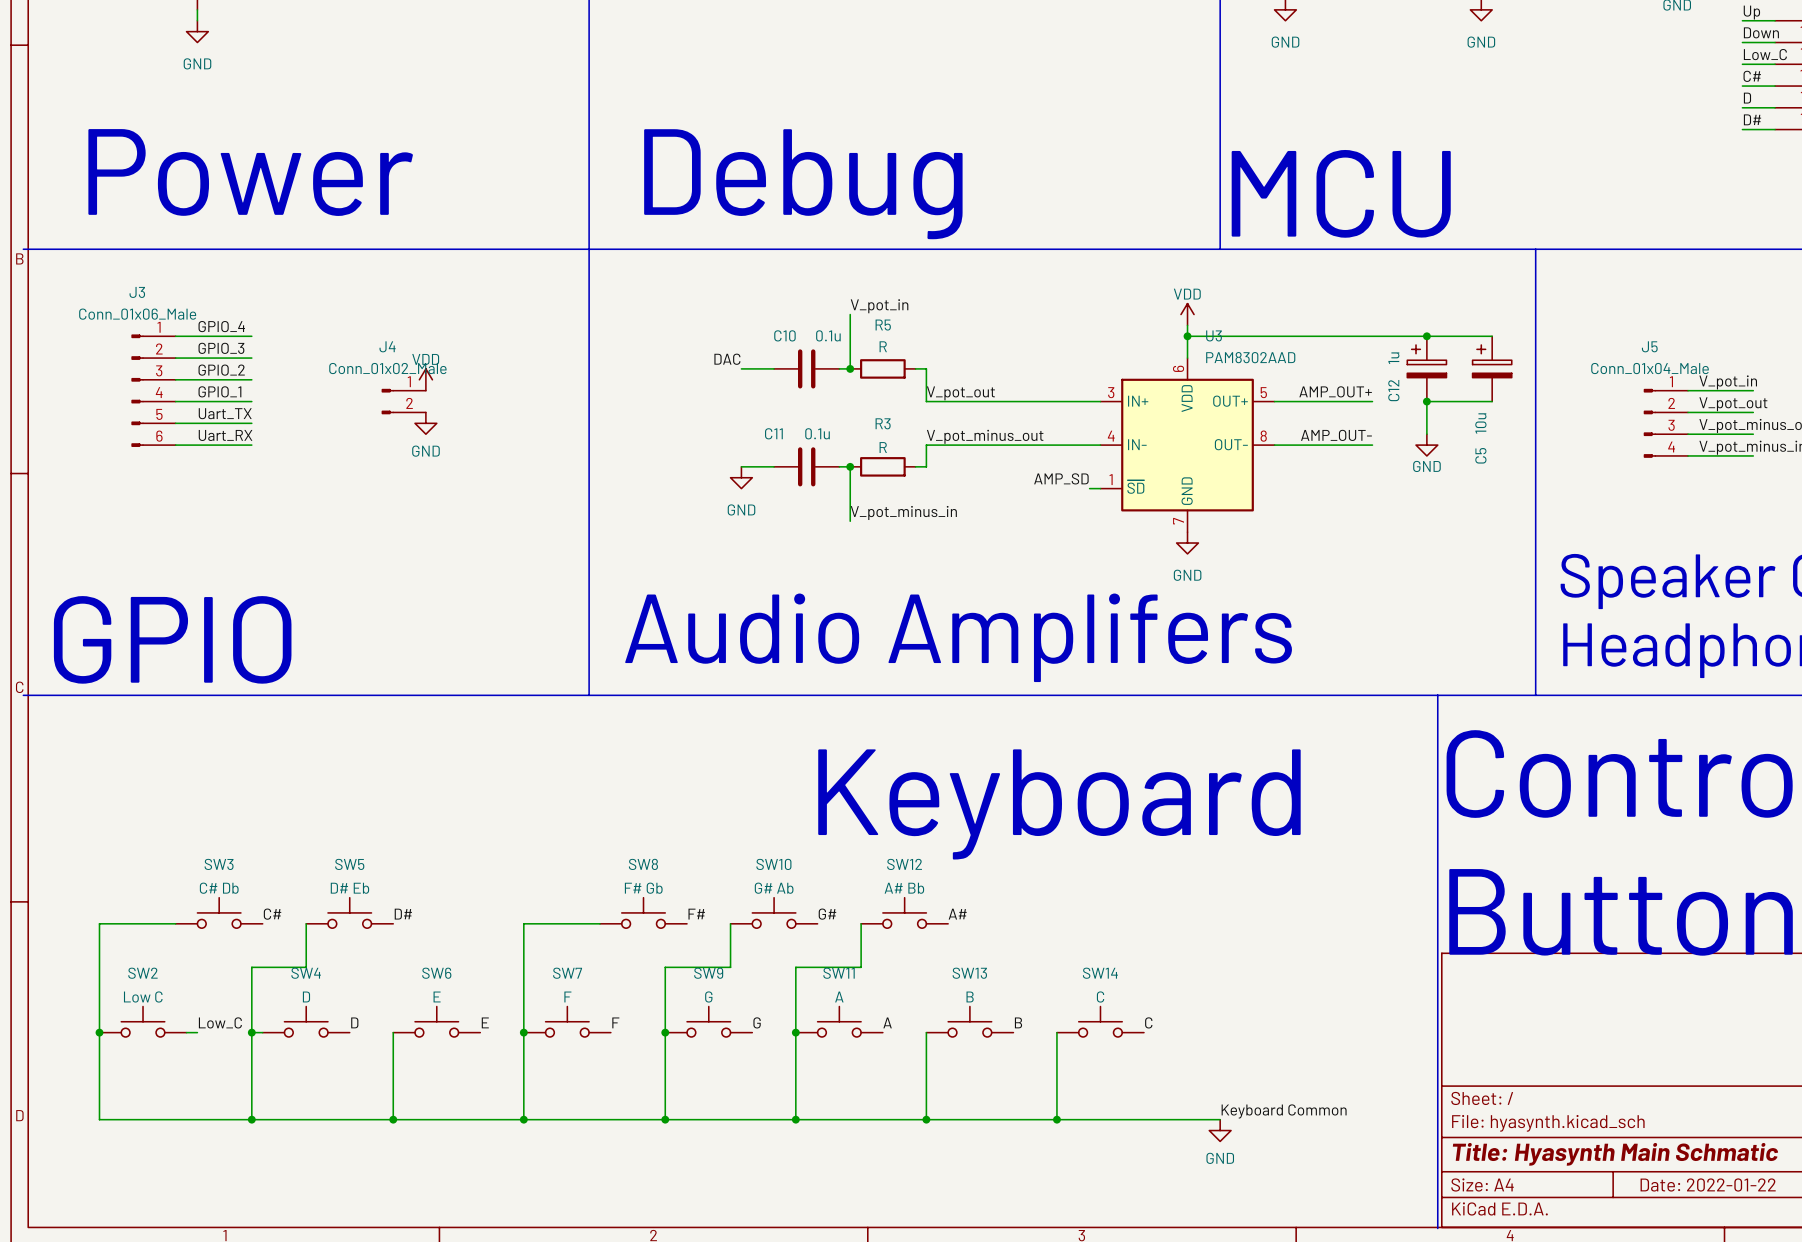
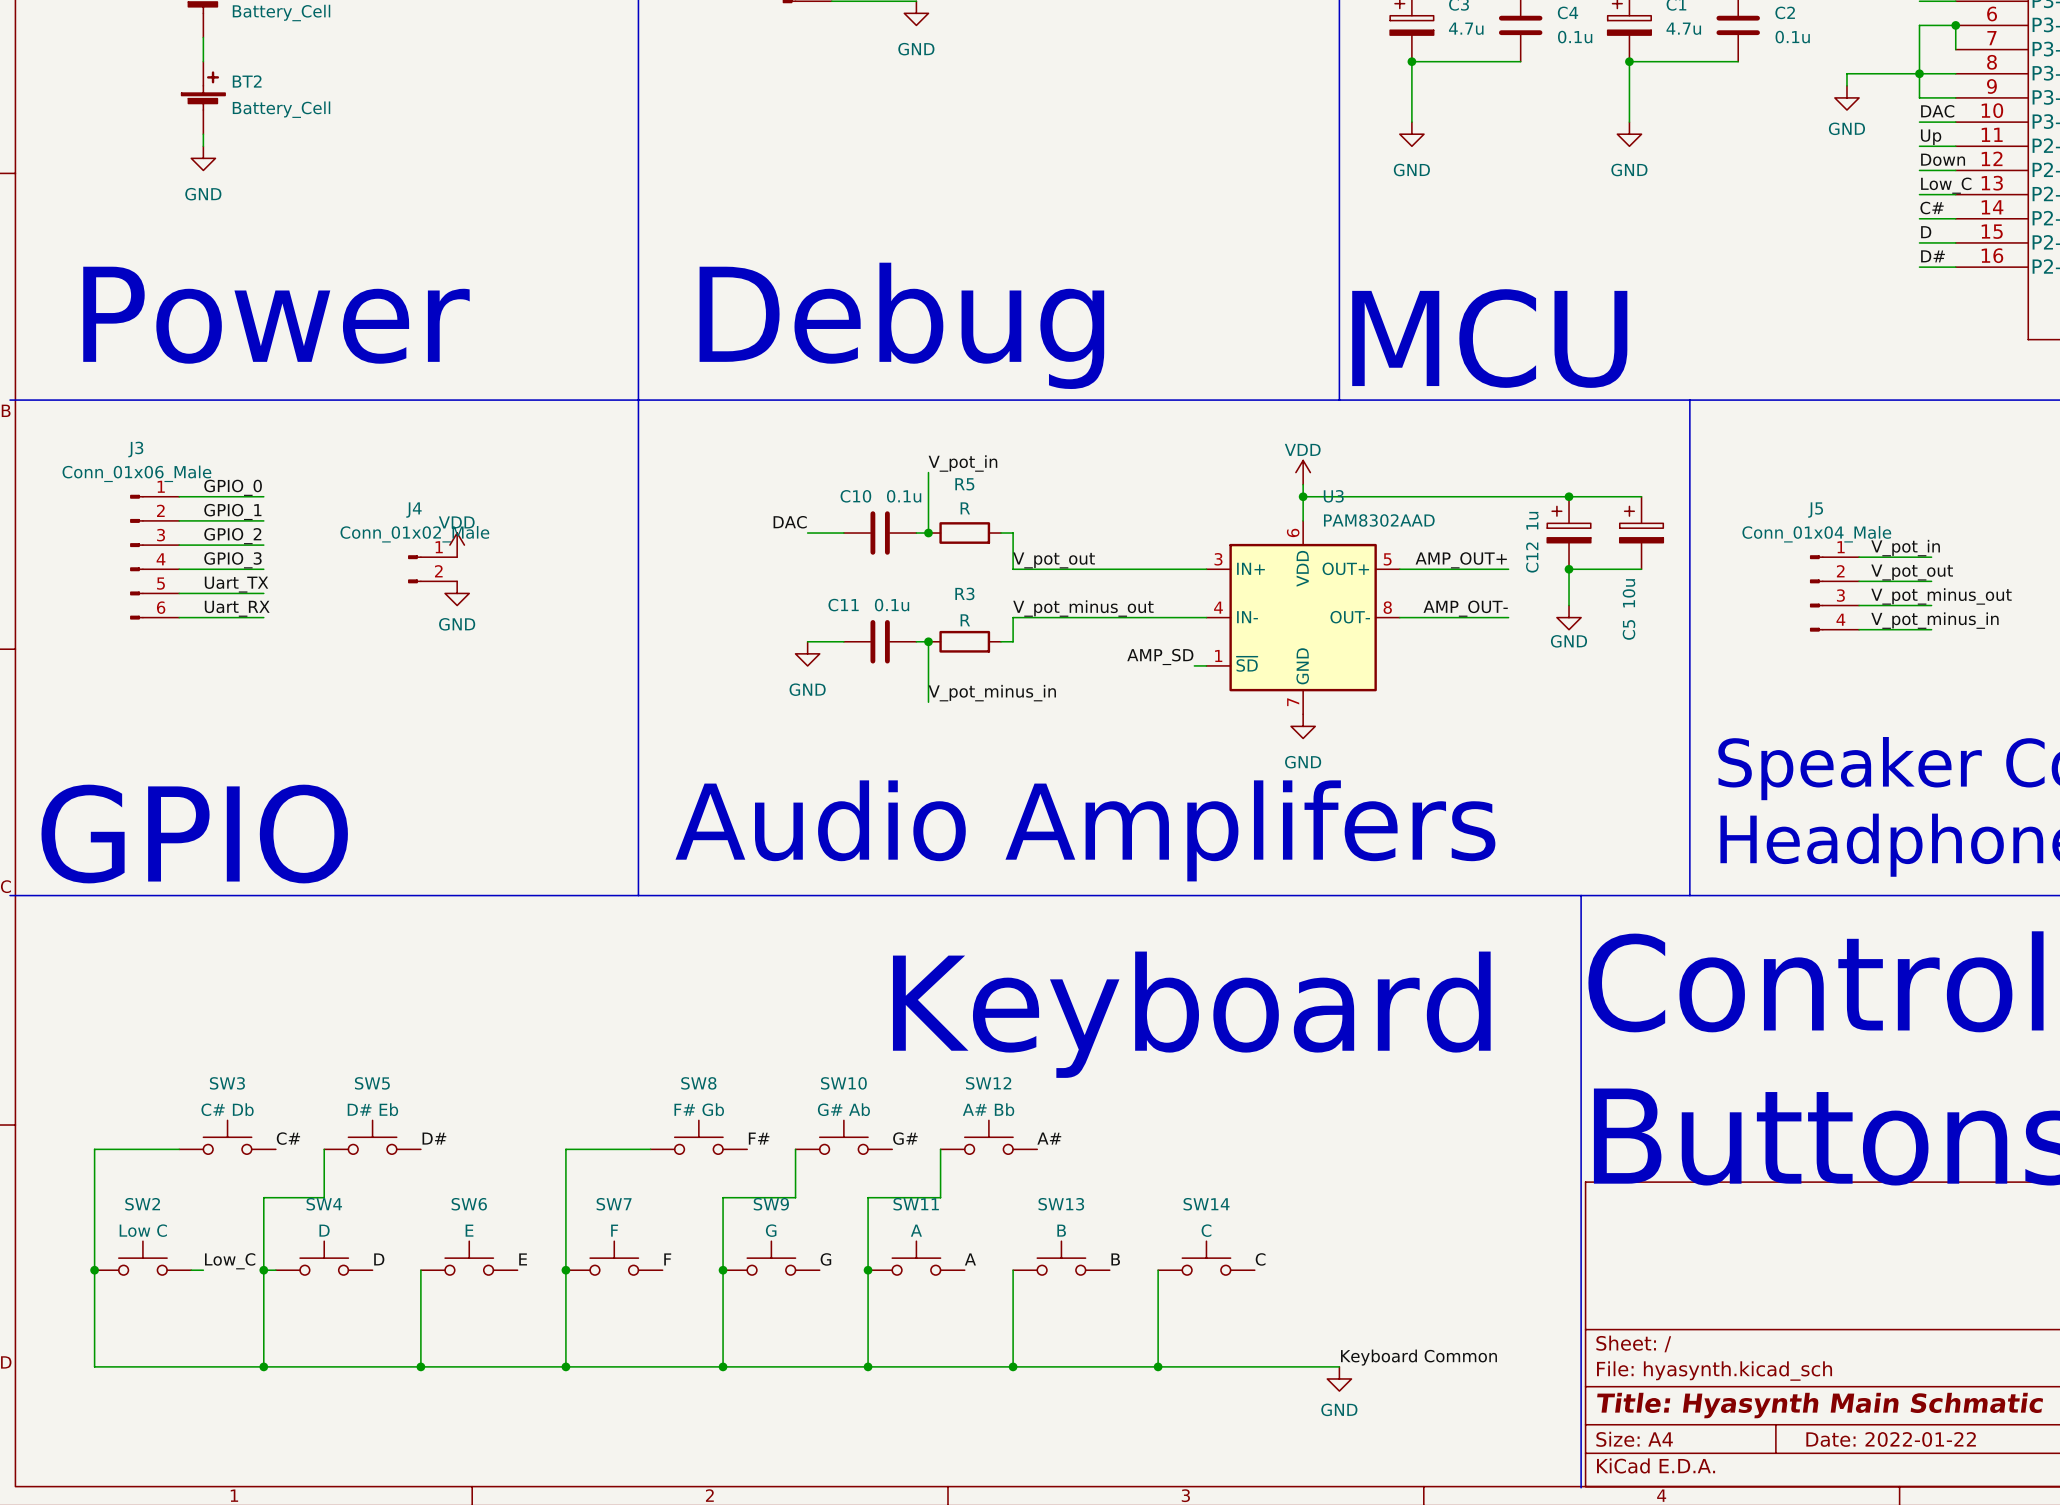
label: GPIO_4 (221, 326) -> GPIO_0 (233, 487)
label: GPIO_3 (221, 348) -> GPIO_1 (232, 511)
label: GPIO_1 (219, 391) -> GPIO_3 (232, 560)

